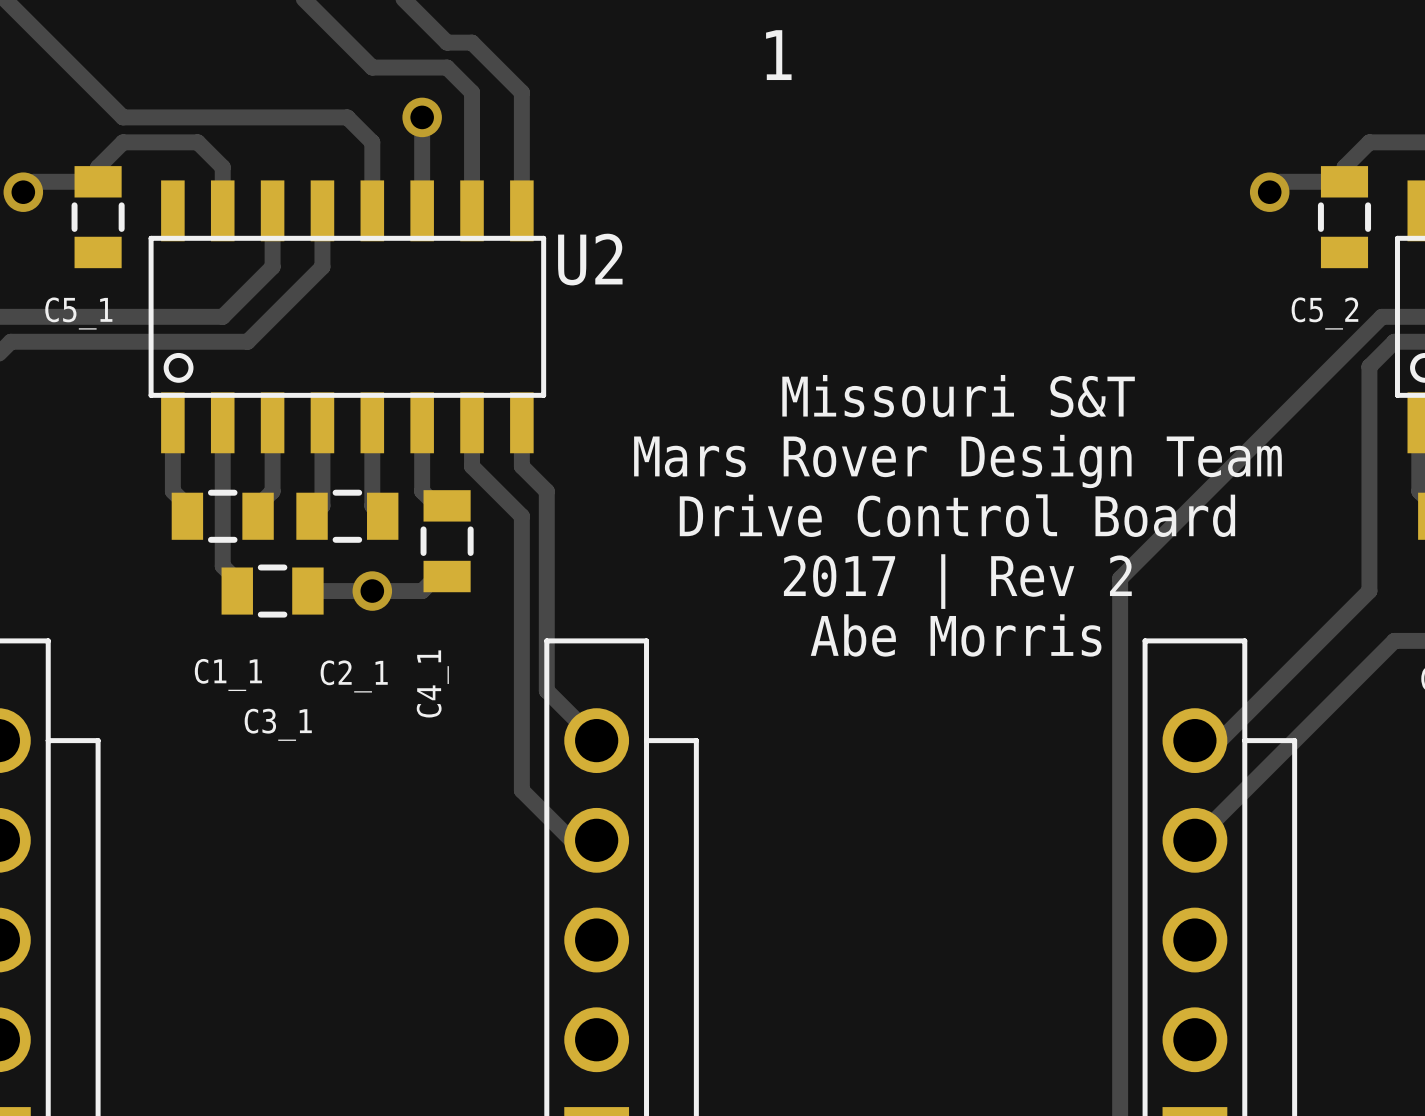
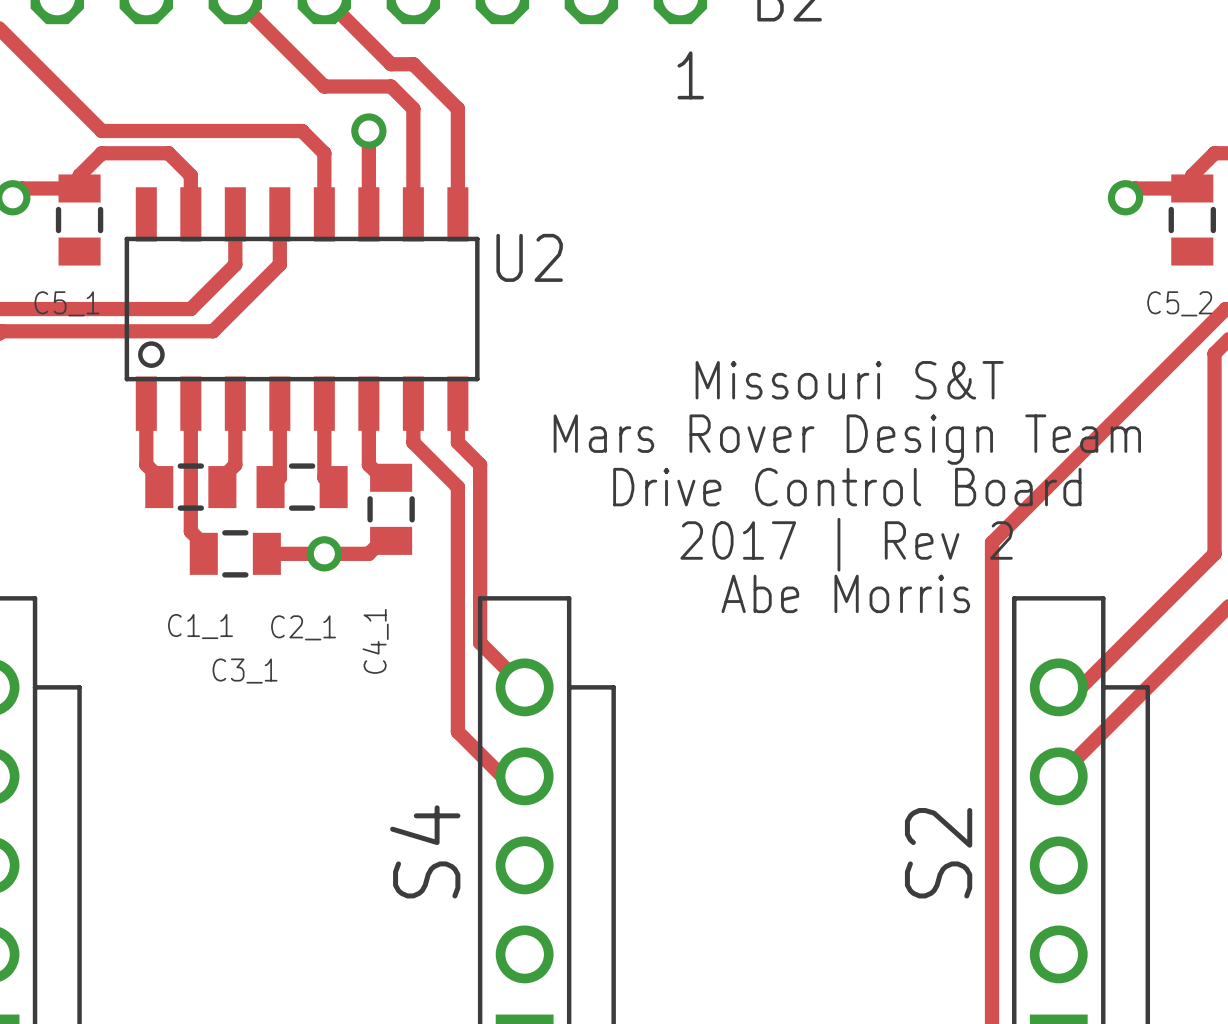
text: none -> S4 (425, 851)
text: none -> S2 (938, 853)

